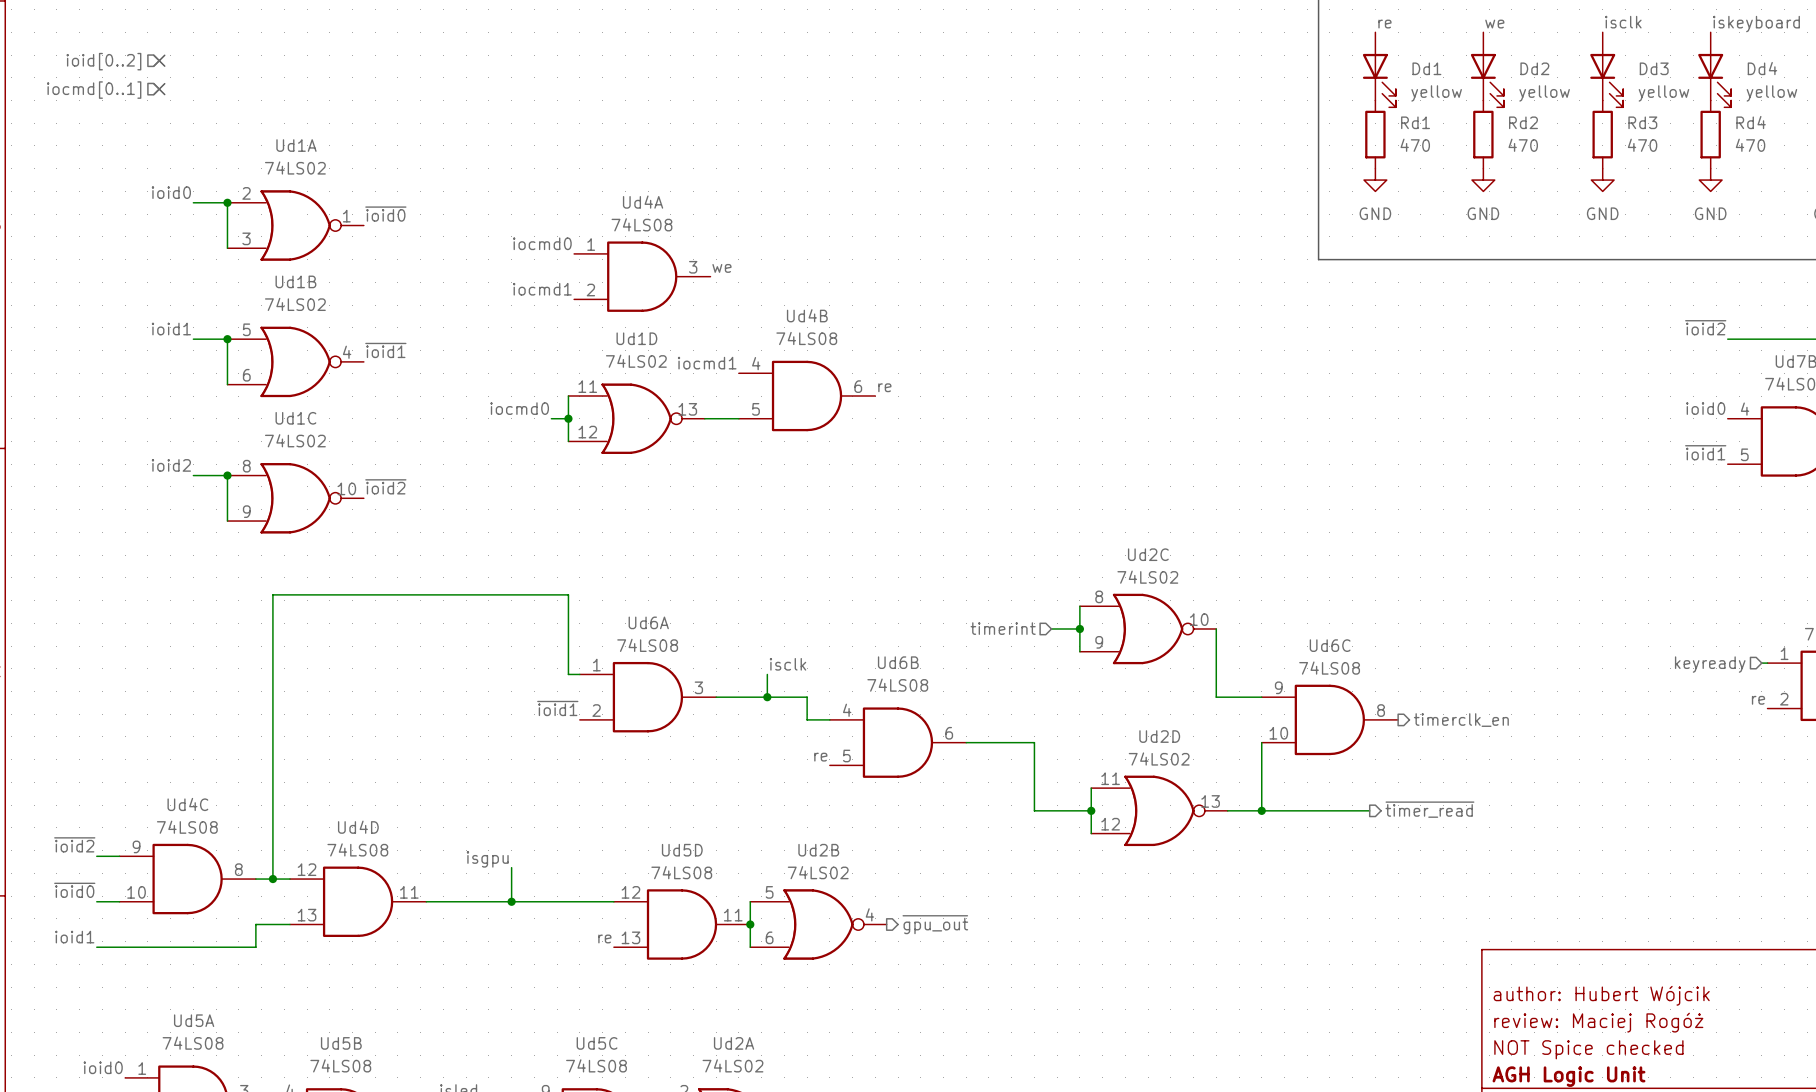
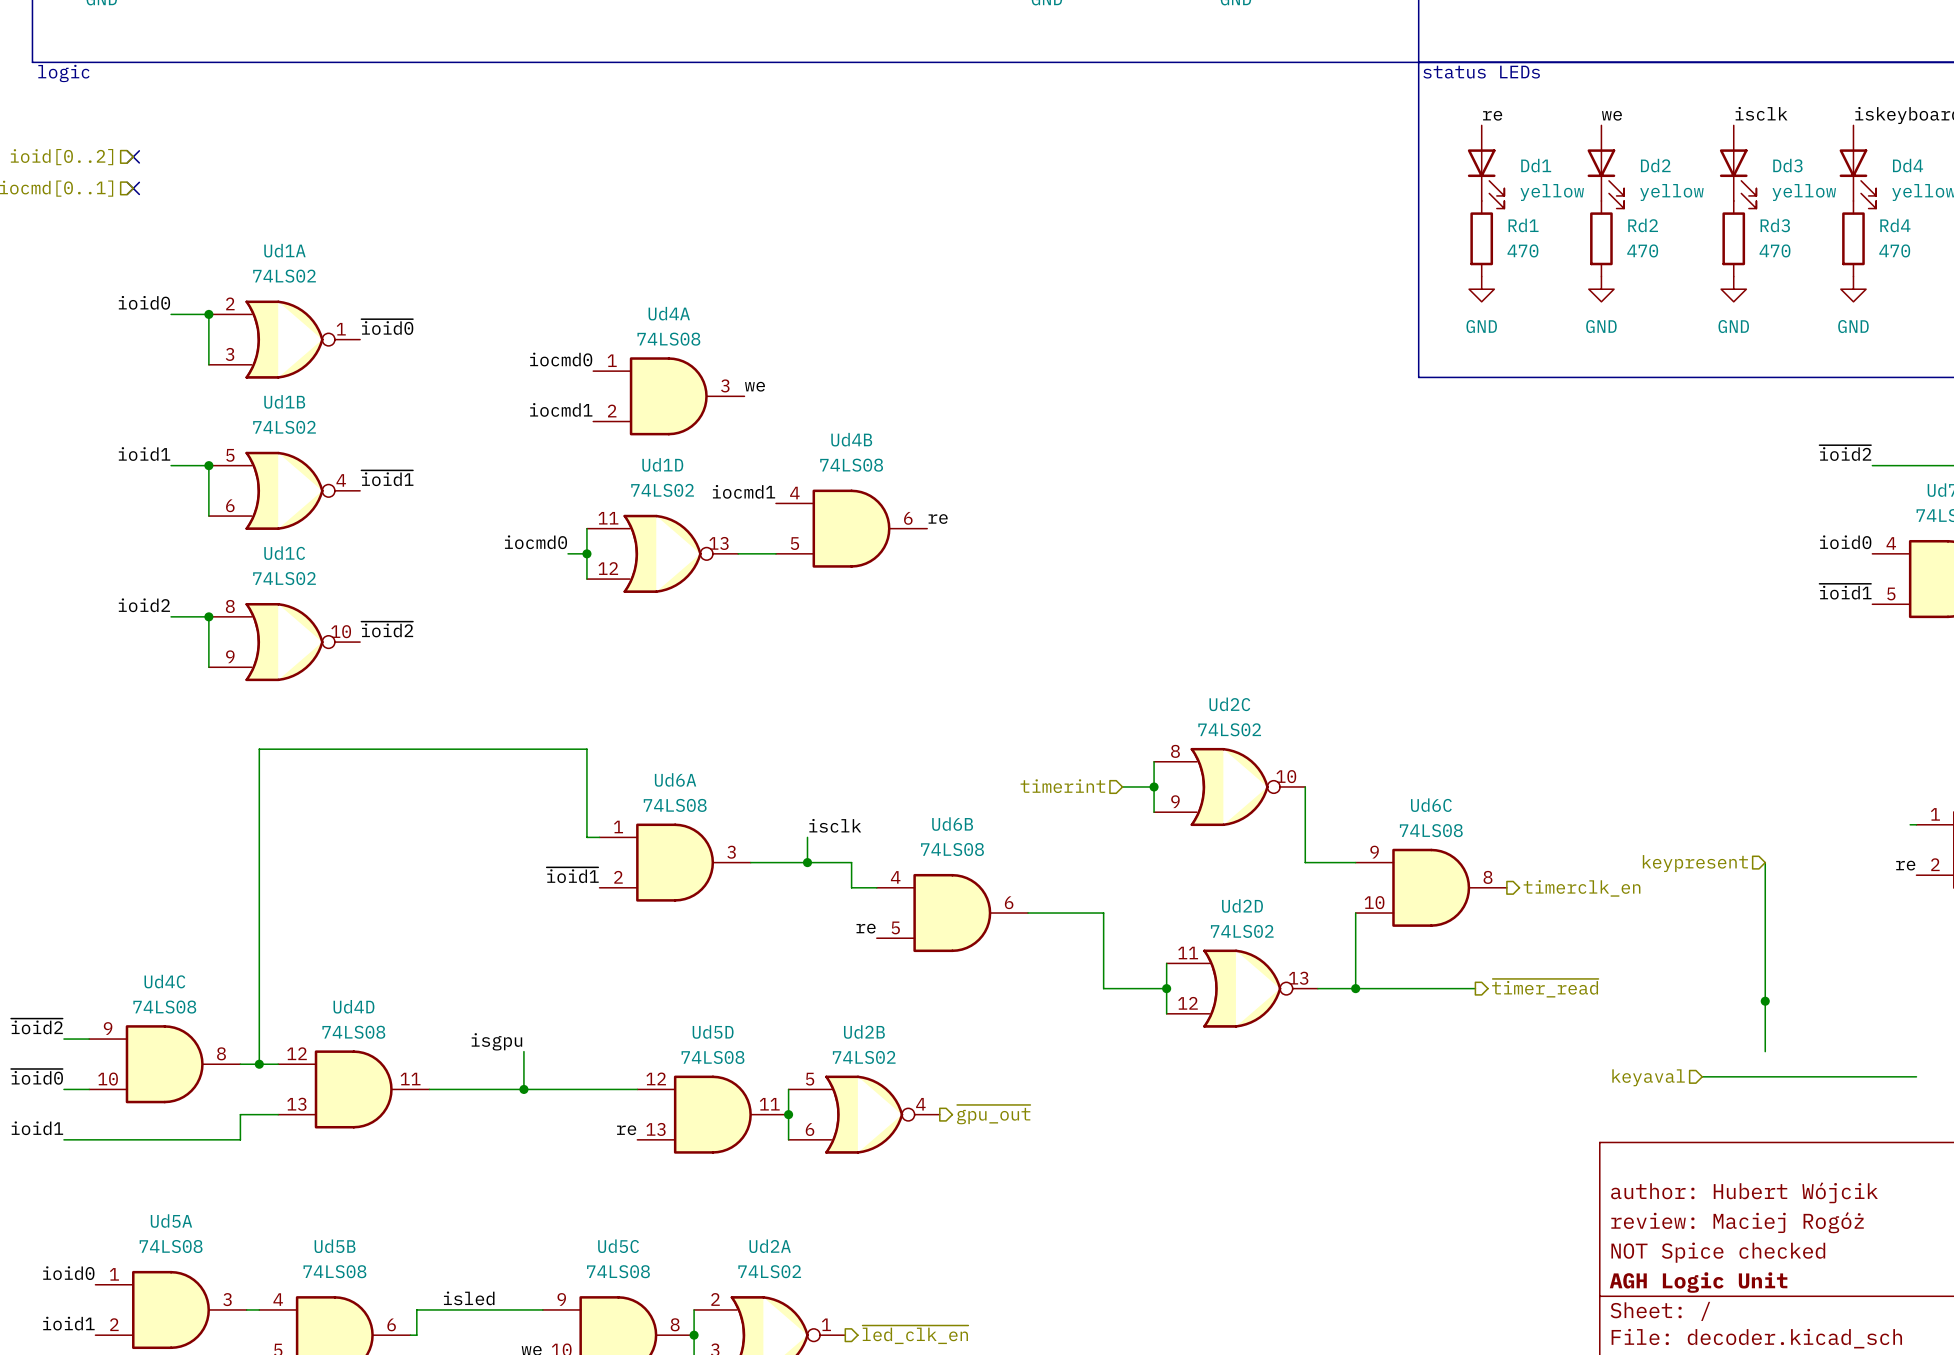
hierarchical label: keyready (1710, 664) -> none
wire: none -> (1765, 862) (1765, 1051)
hierarchical label: none -> keypresent (1695, 863)
junction: none -> (1765, 1001)
wire: none -> (1702, 1076) (1916, 1076)
hierarchical label: none -> keyaval (1648, 1077)

